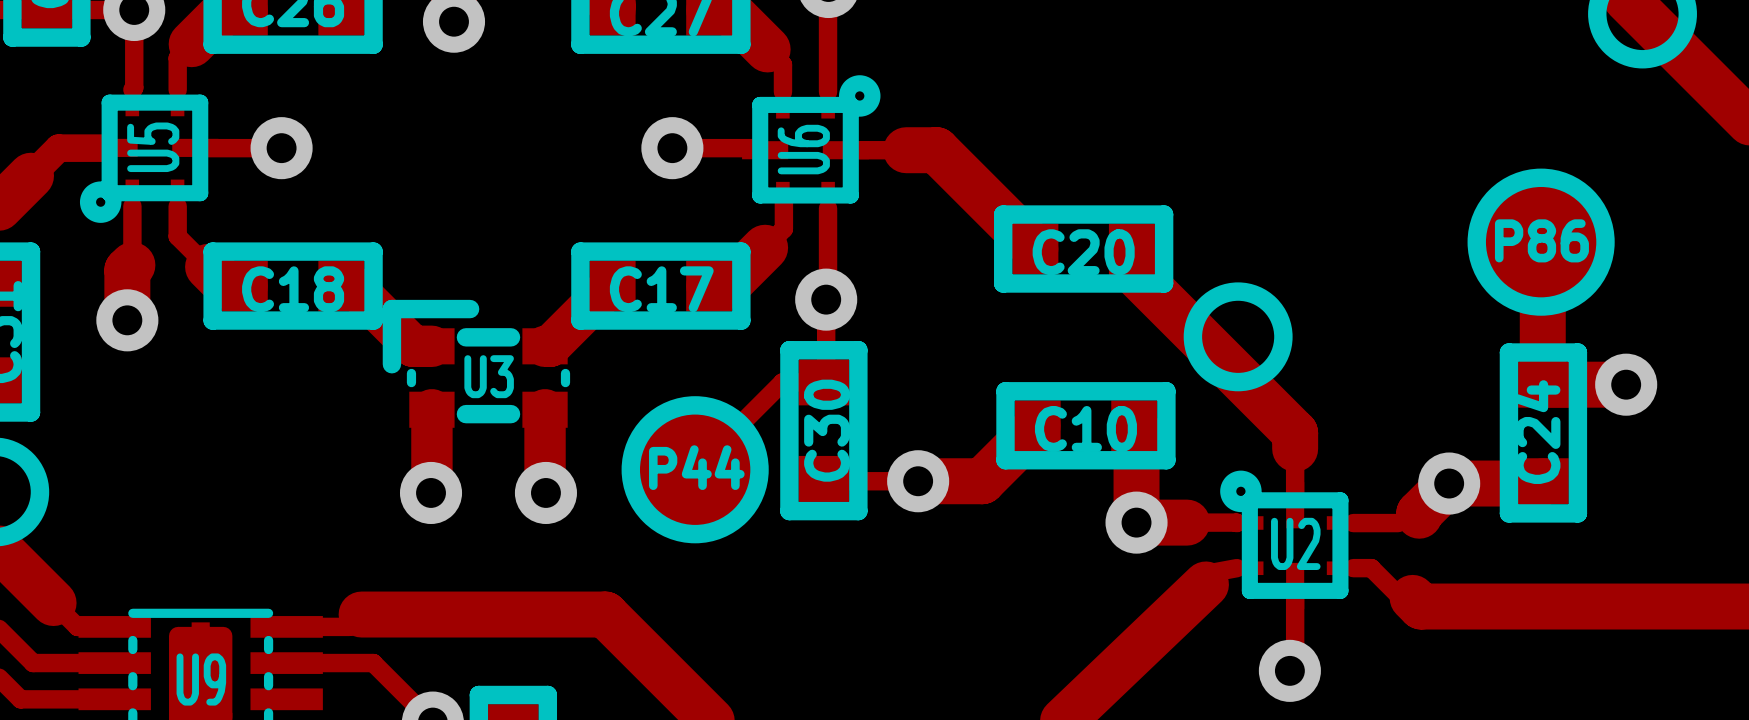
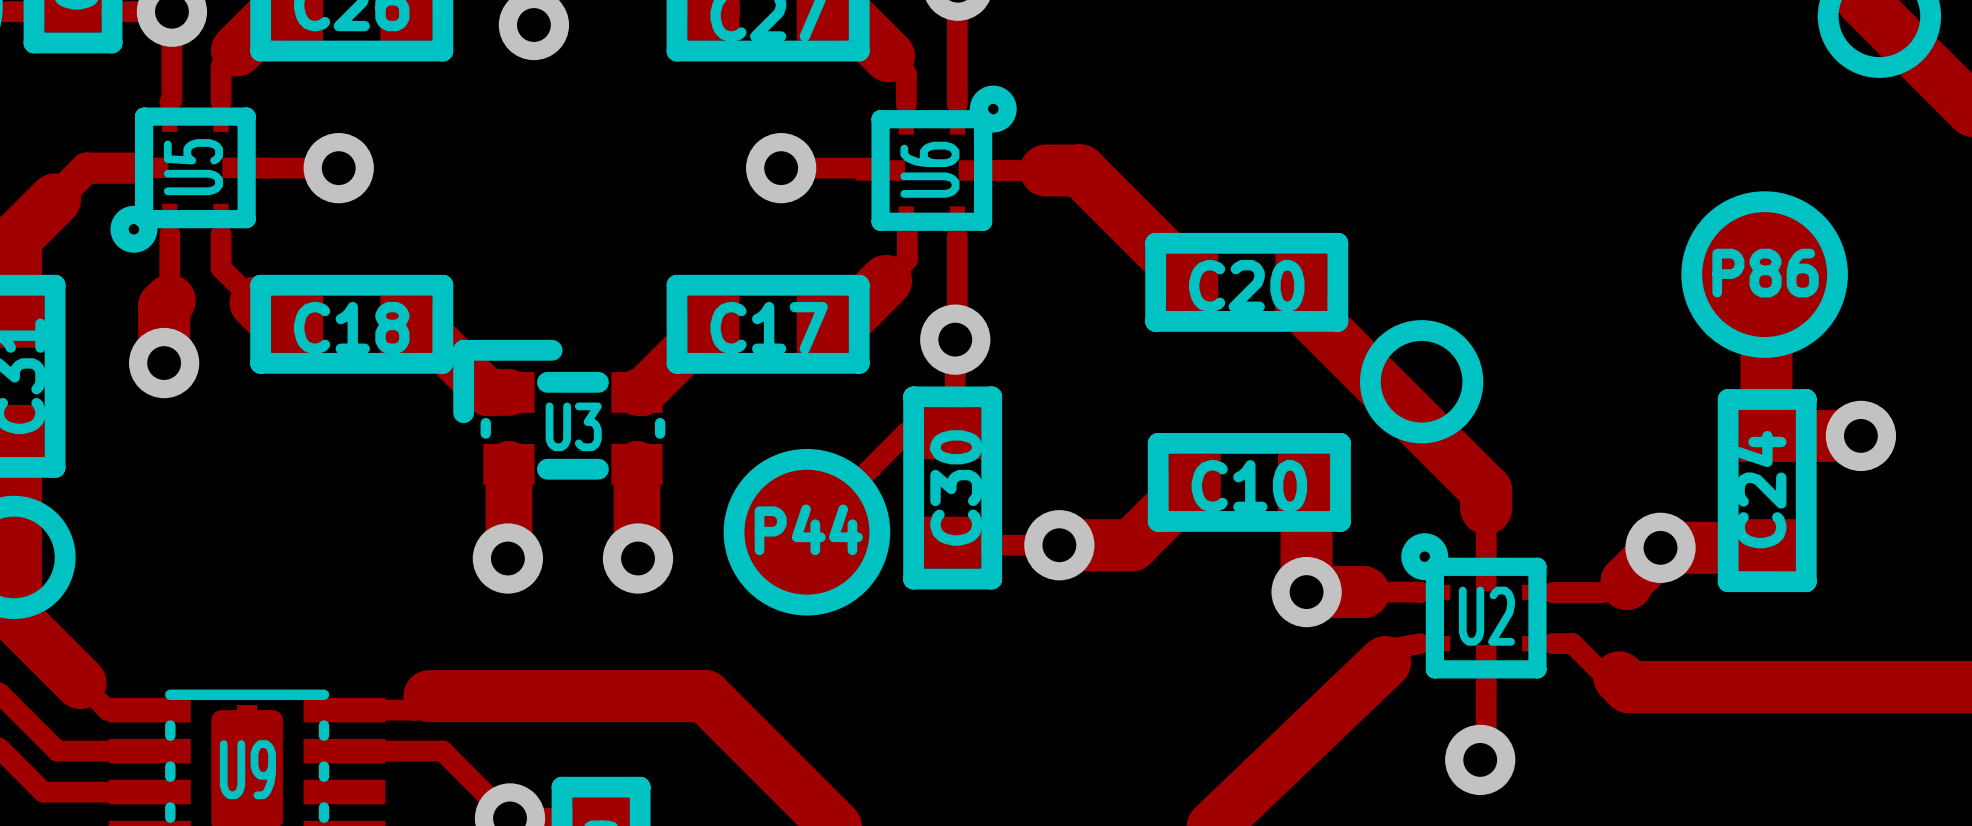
U6 footprint: [742, 75, 881, 210] -> [856, 85, 1017, 238]
U5 footprint: [79, 89, 219, 223] -> [110, 101, 271, 253]
U2 footprint: [1220, 470, 1354, 610] -> [1401, 533, 1553, 694]

